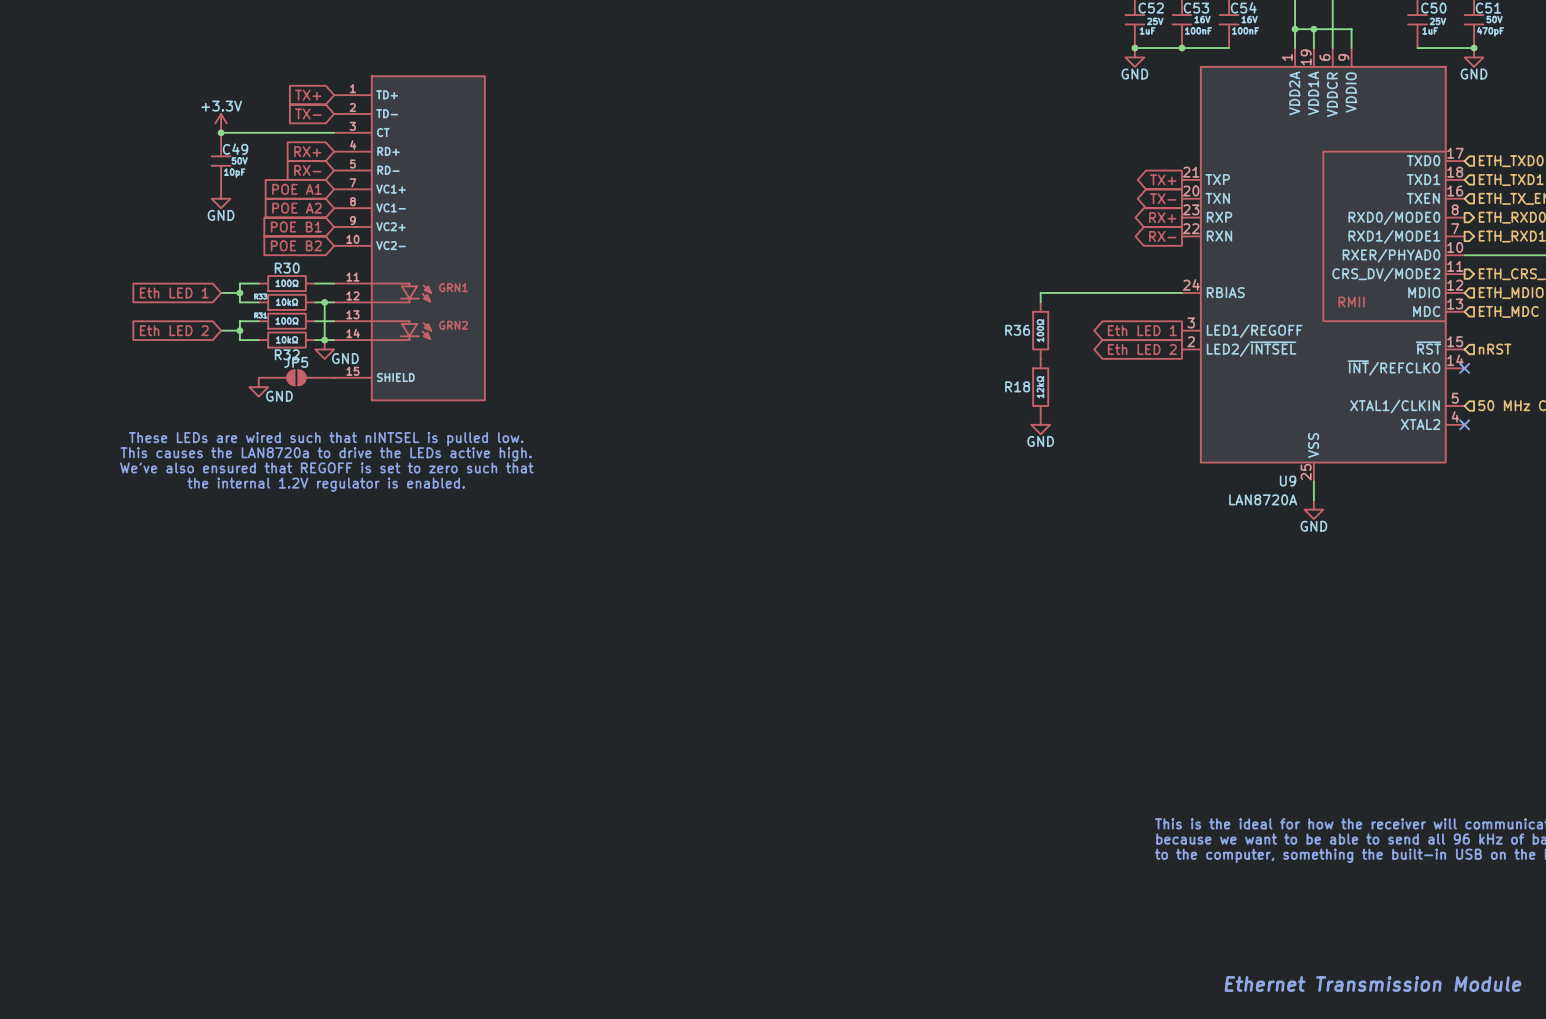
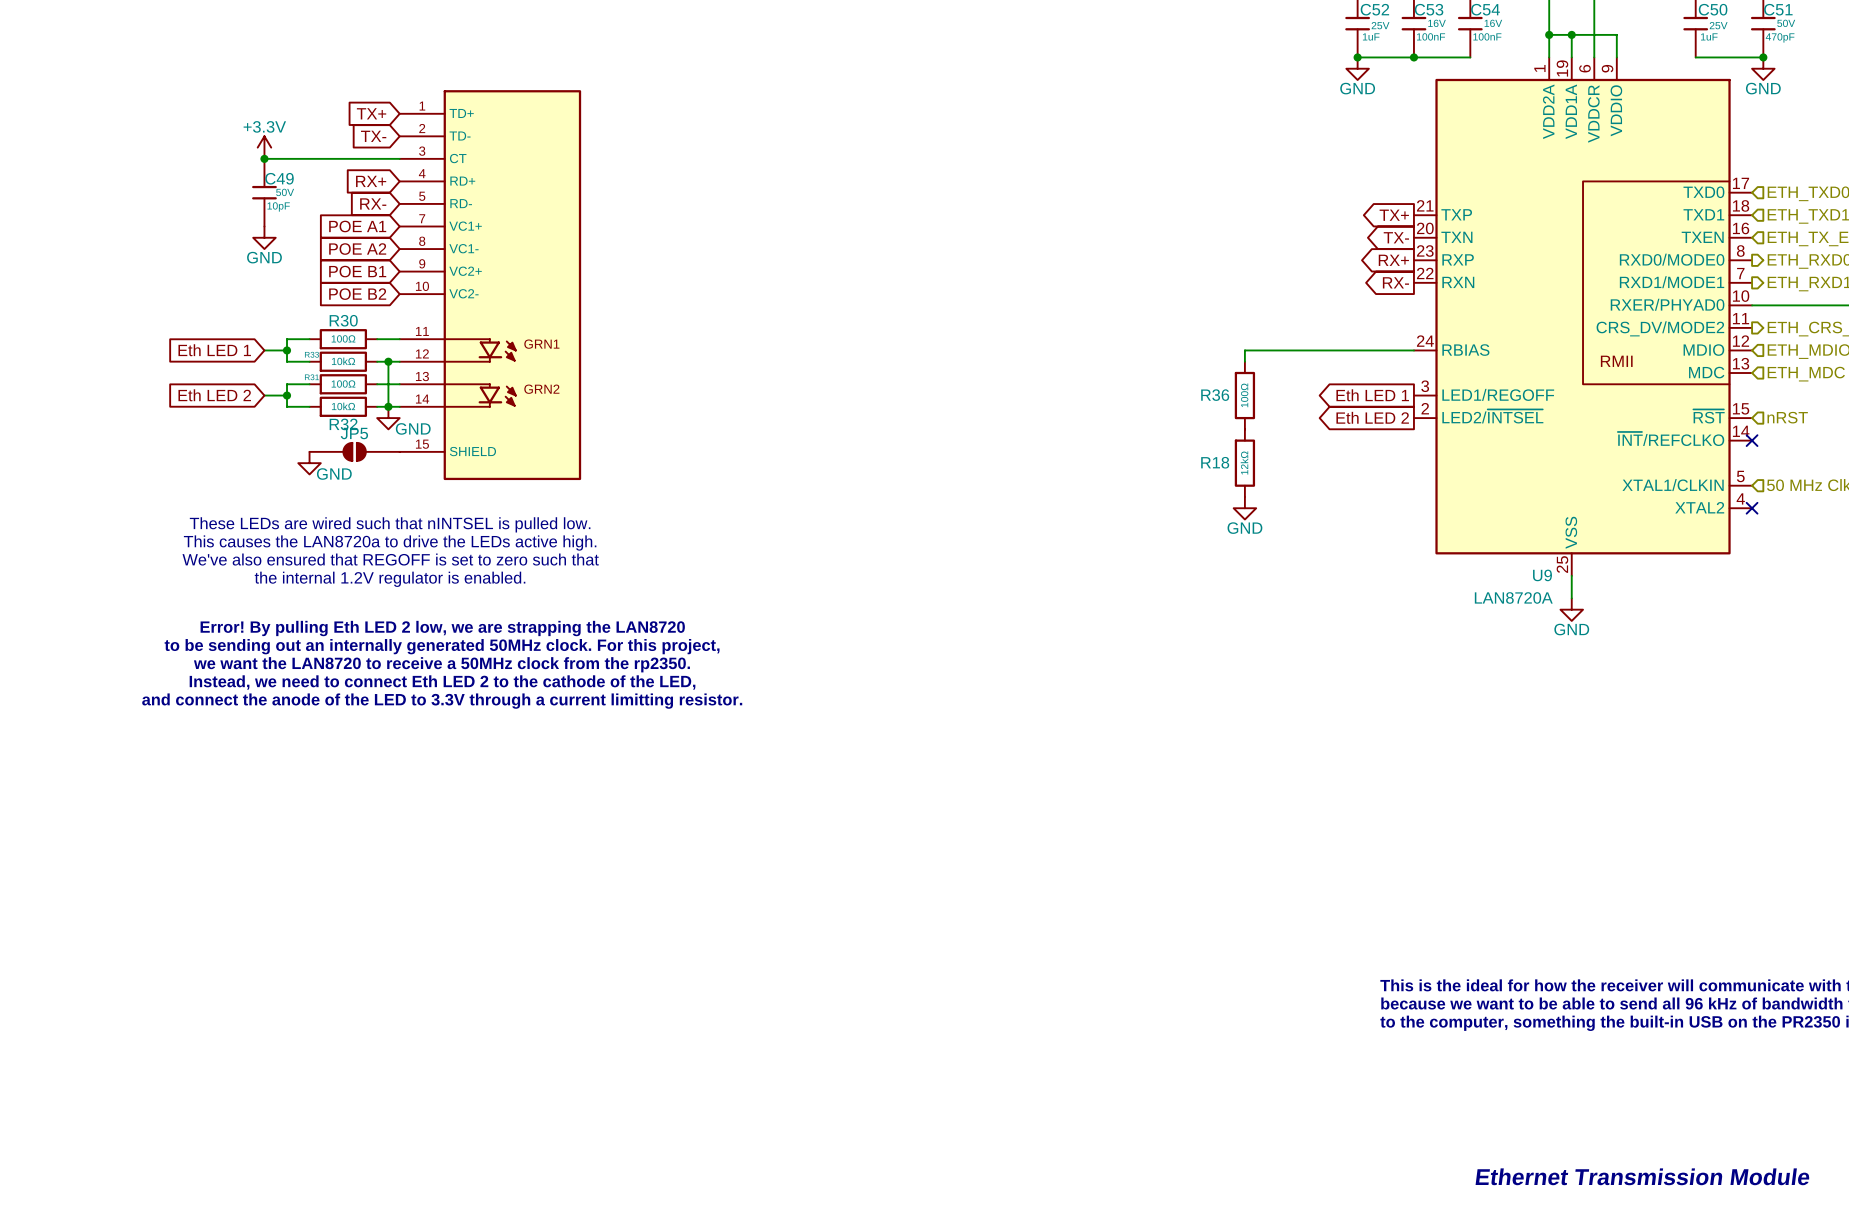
text: none -> Error! By pulling Eth LED 2 low, we are strapping the LAN8720 (442, 628)
text: none -> to be sending out an internally generated 50MHz clock. For this project, (442, 646)
text: none -> we want the LAN8720 to receive a 50MHz clock from the rp2350. (441, 664)
text: none -> Instead, we need to connect Eth LED 2 to the cathode of the LED, (442, 682)
text: none -> and connect the anode of the LED to 3.3V through a current limitting resistor. (442, 701)

